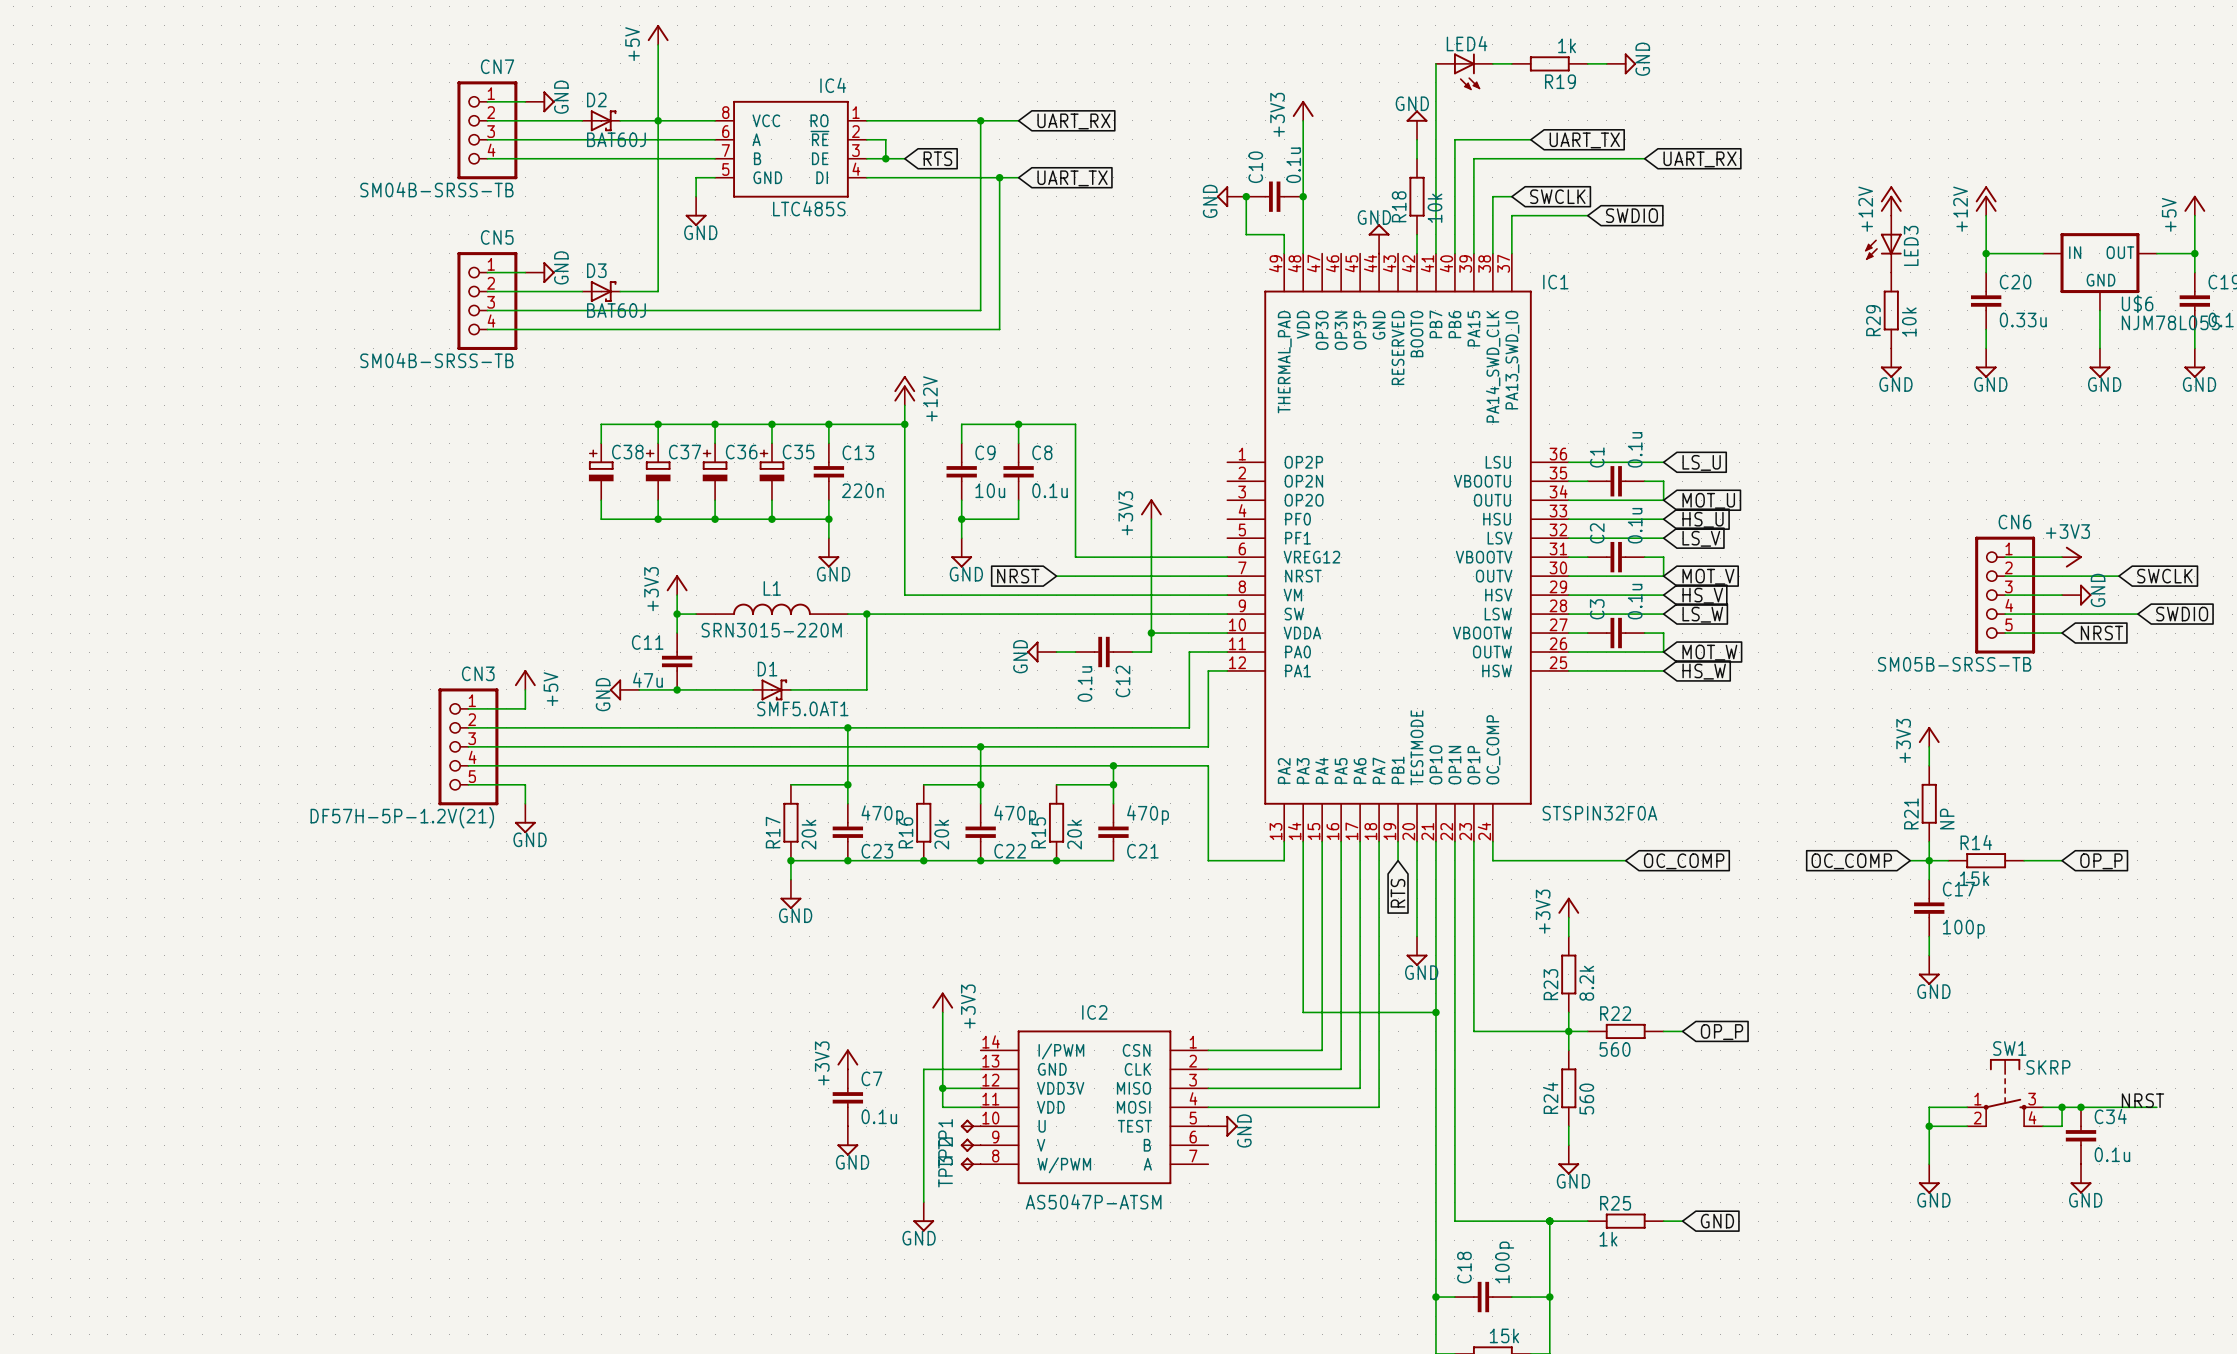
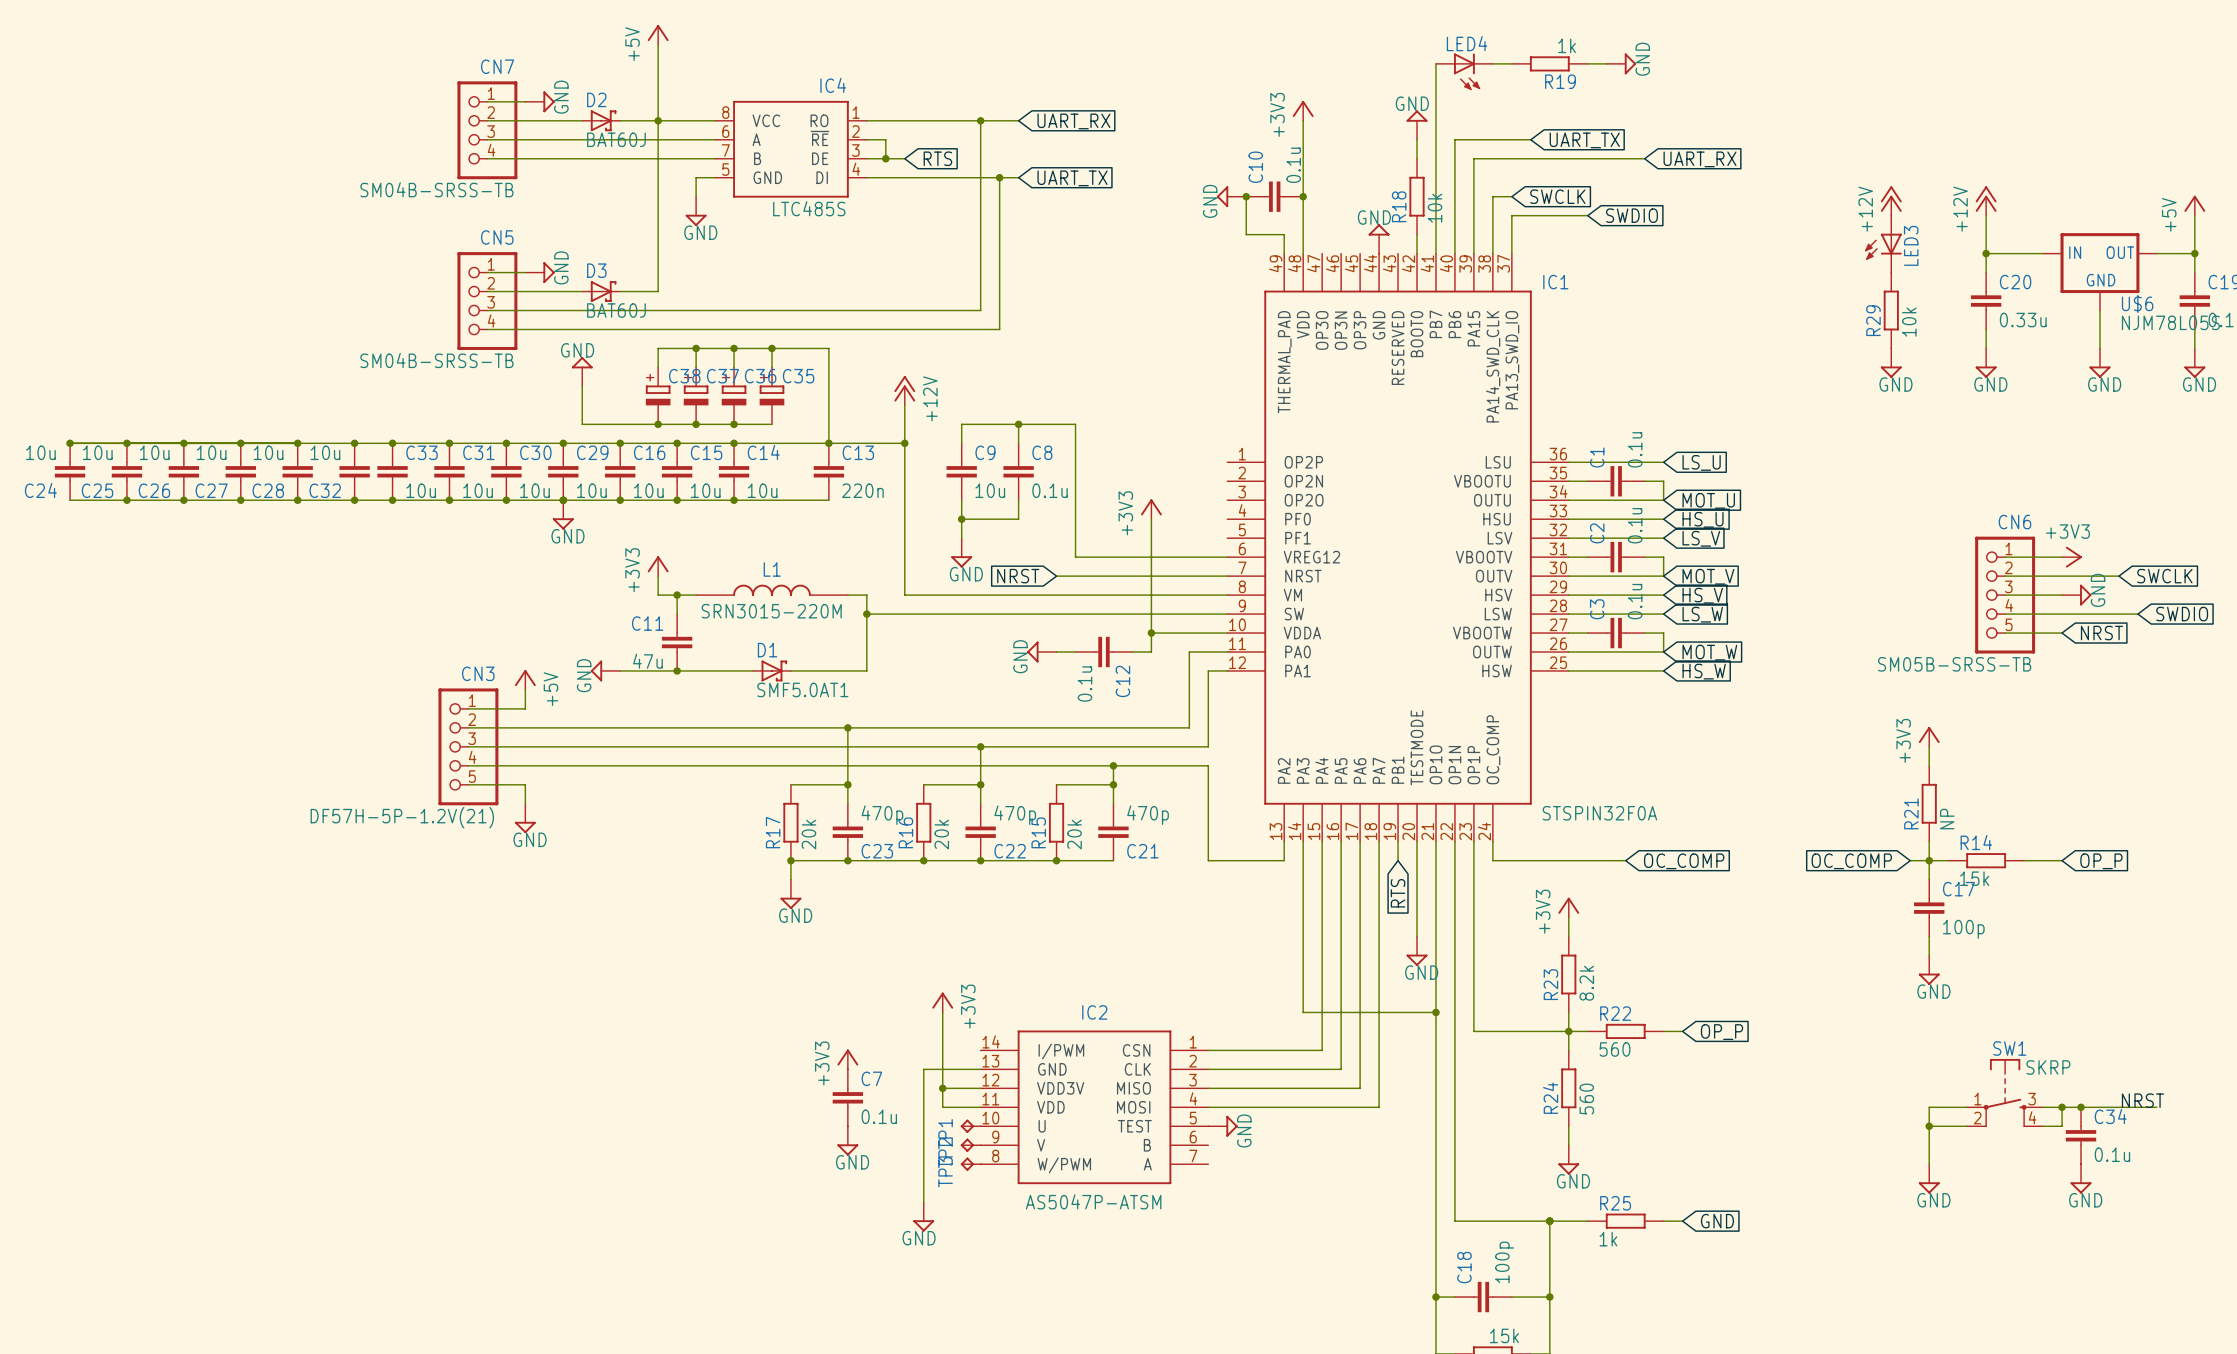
junction: none -> (696, 348)
junction: none -> (734, 348)
junction: none -> (771, 348)
wire: none -> (658, 367) (658, 348) (828, 348) (828, 424)
power symbol: none -> GND (582, 371)
wire: (601, 424) (601, 443) -> (601, 424) (582, 424) (582, 386)
wire: (658, 424) (658, 443) -> (734, 348) (734, 367)
junction: none -> (696, 424)
wire: (715, 424) (715, 443) -> (696, 348) (696, 367)
junction: (715, 424) -> none
junction: none -> (734, 424)
junction: (771, 424) -> none
junction position: (828, 424) -> (828, 443)
wire: (904, 424) (771, 424) (771, 443) -> none
junction position: (904, 424) -> (904, 443)
wire: none -> (70, 443) (904, 443)
junction: none -> (70, 443)
junction: none -> (126, 443)
junction: none -> (183, 443)
junction: none -> (240, 443)
junction: none -> (297, 443)
junction: none -> (354, 443)
junction: none -> (392, 443)
junction: none -> (449, 443)
junction: none -> (506, 443)
junction: none -> (563, 443)
junction: none -> (620, 443)
junction: none -> (677, 443)
junction: none -> (734, 443)
C24: none -> 10u (70, 471)
C25: none -> 10u (126, 471)
C26: none -> 10u (183, 471)
C27: none -> 10u (240, 471)
C28: none -> 10u (297, 471)
C32: none -> 10u (354, 471)
C33: none -> 10u (392, 471)
C31: none -> 10u (449, 471)
C30: none -> 10u (506, 471)
C29: none -> 10u (563, 471)
C38 position: (601, 471) -> (658, 395)
C16: none -> 10u (620, 471)
C37 position: (658, 471) -> (696, 395)
C15: none -> 10u (677, 471)
C36 position: (715, 471) -> (734, 395)
C14: none -> 10u (734, 471)
C35 position: (771, 471) -> (771, 395)
junction: none -> (126, 500)
junction: none -> (183, 500)
junction: none -> (240, 500)
junction: none -> (297, 500)
junction: none -> (354, 500)
junction: none -> (392, 500)
junction: none -> (449, 500)
junction: none -> (506, 500)
junction: none -> (563, 500)
wire: (601, 500) (601, 519) (828, 519) -> none
junction: none -> (620, 500)
wire: (658, 500) (658, 519) -> none
junction: none -> (677, 500)
wire: (715, 500) (715, 519) -> none
junction: none -> (734, 500)
wire: (771, 500) (771, 519) -> (771, 348) (771, 367)
wire: (828, 500) (828, 538) -> (828, 500) (70, 500)
power symbol: none -> GND (563, 514)
junction: (658, 519) -> none
junction: (715, 519) -> none
junction: (771, 519) -> none
junction: (828, 519) -> none
power symbol: GND (828, 552) -> none
wire: none -> (658, 576) (658, 595) (696, 595)
power symbol position: +3V3 (677, 585) -> +3V3 (658, 566)
L1 position: (771, 609) -> (771, 590)
junction position: (677, 614) -> (677, 595)
wire: (696, 614) (677, 614) (677, 633) -> none
wire: (847, 614) (866, 614) -> (847, 595) (866, 595) (866, 614)
C11 position: (677, 661) -> (677, 642)
wire: none -> (620, 670) (753, 670)
wire: (866, 670) (866, 689) (790, 689) -> (866, 670) (790, 670)
power symbol position: GND (624, 689) -> GND (605, 670)
wire: (639, 689) (753, 689) -> none
junction position: (677, 689) -> (677, 670)
D1 position: (771, 689) -> (771, 670)

